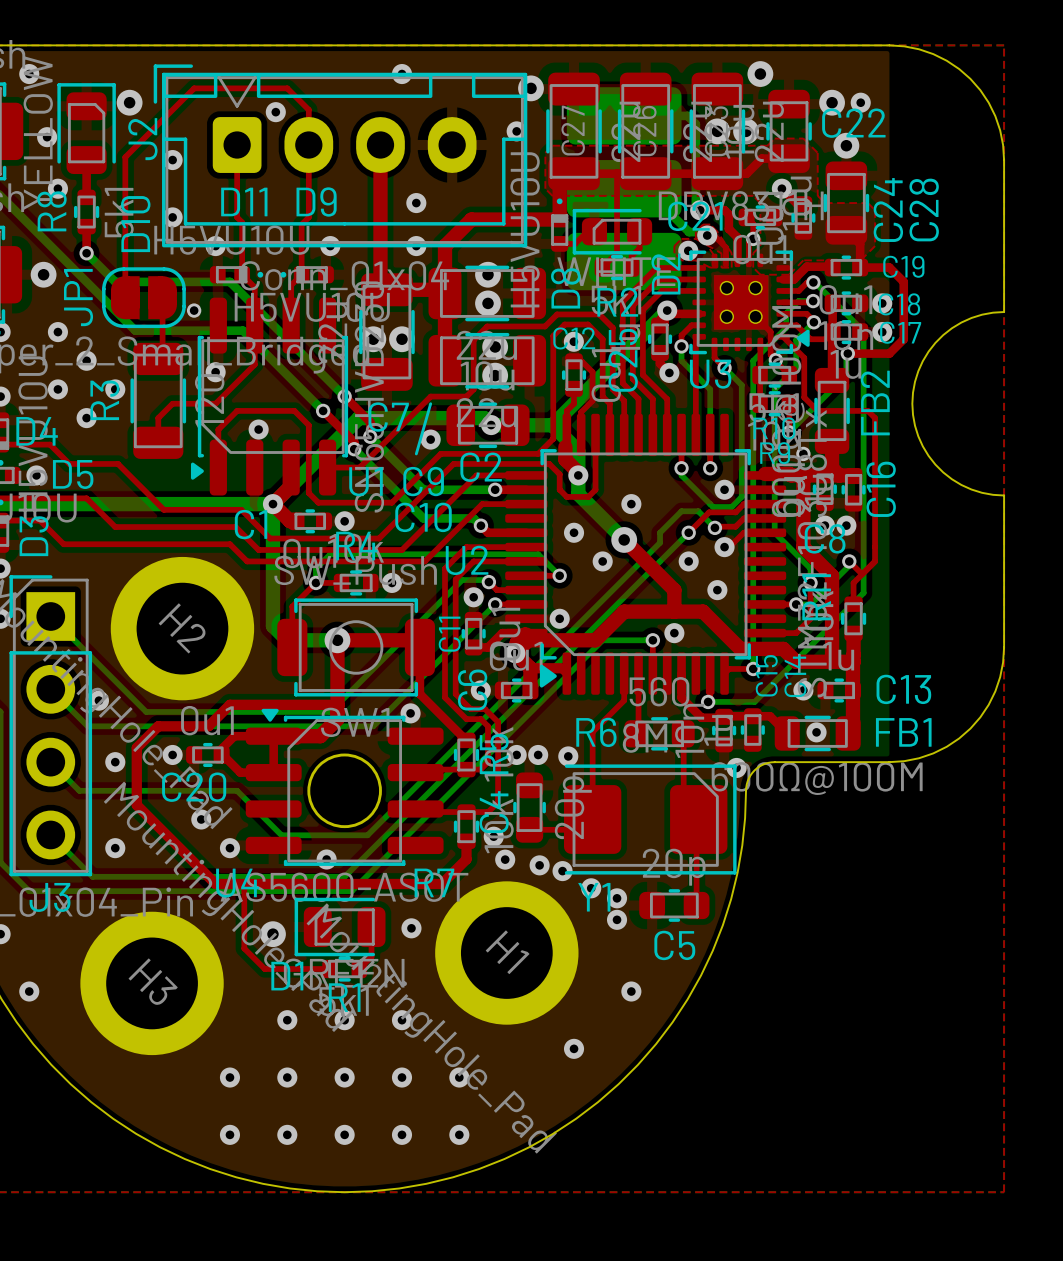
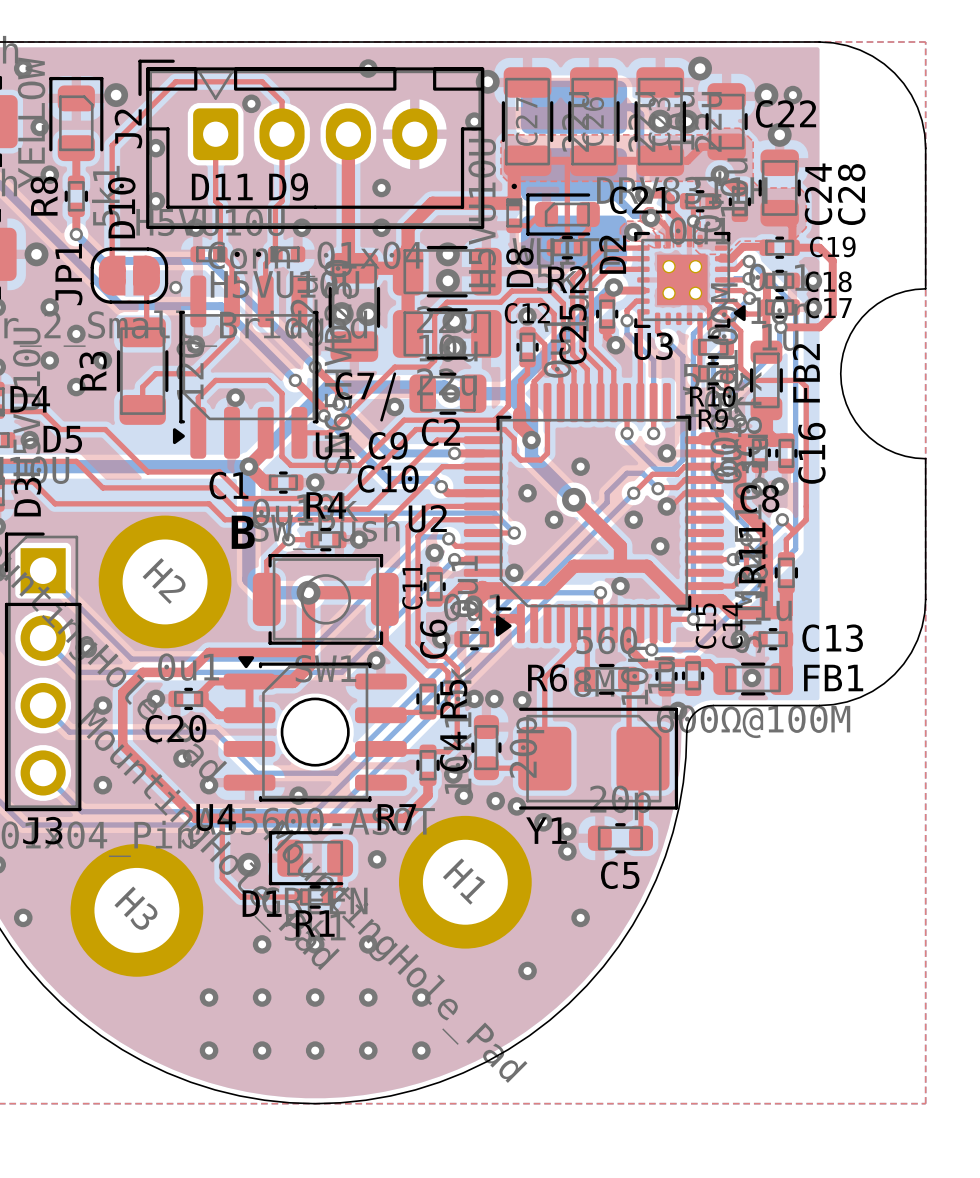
text: none -> B (243, 532)

